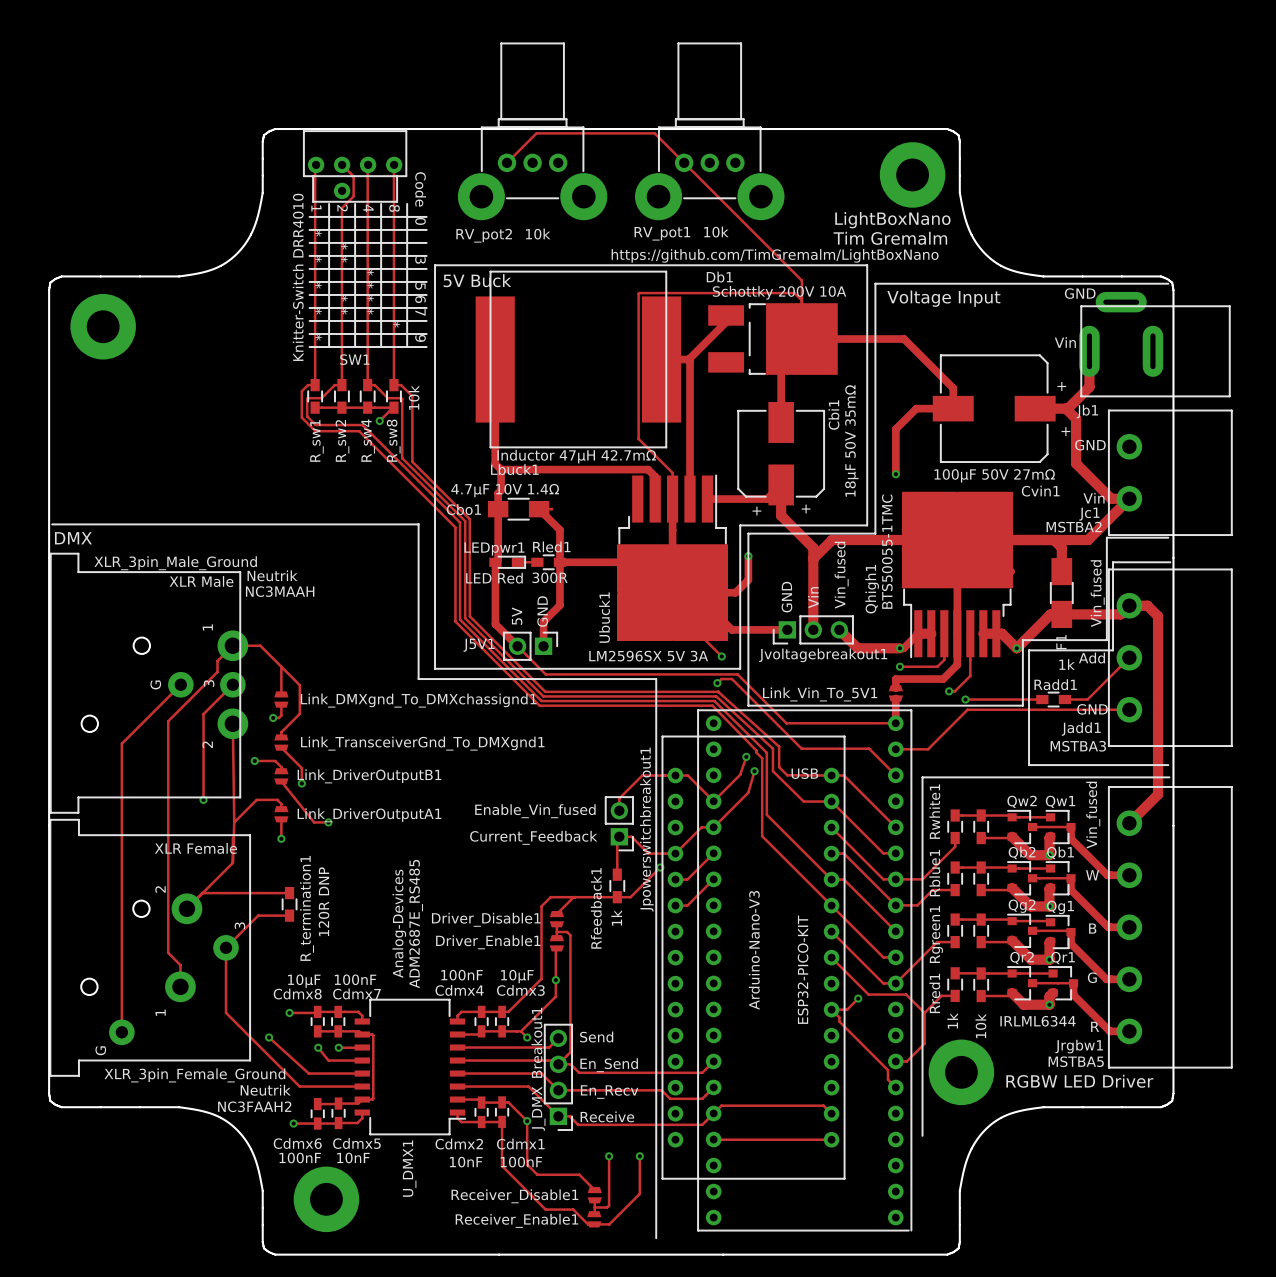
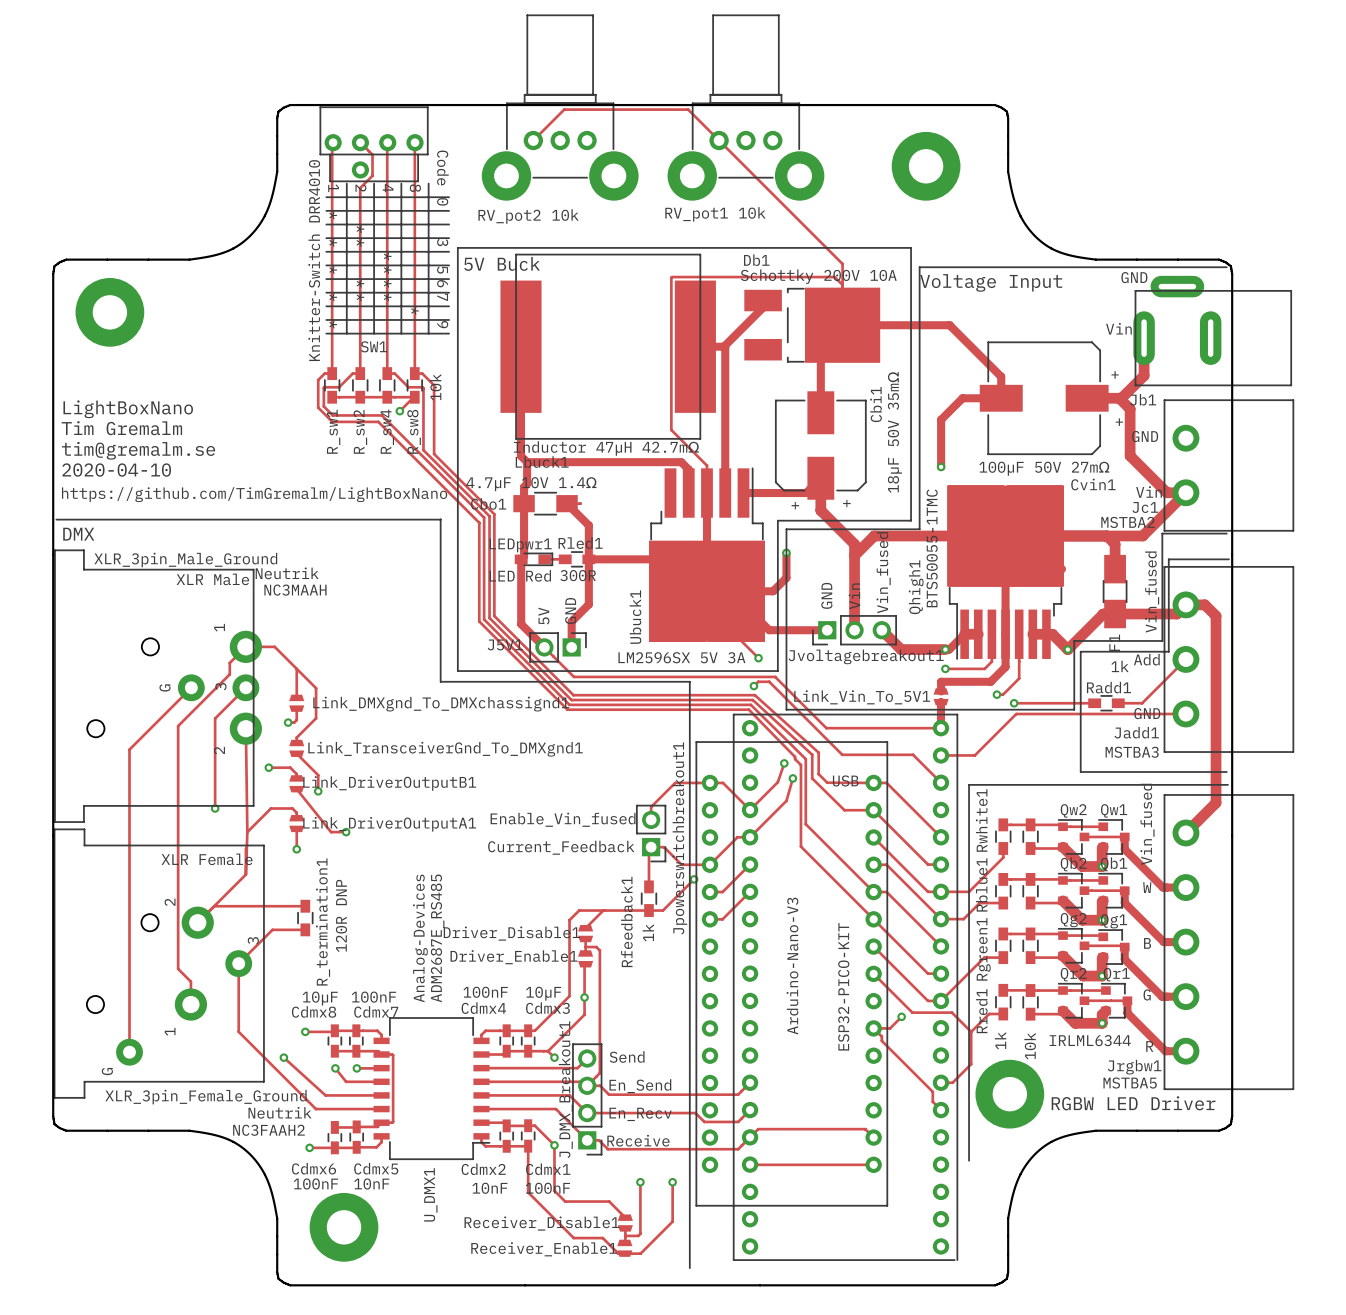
part position: (912, 174) -> (926, 166)
text: LightBoxNano (892, 220) -> none
text: Tim Gremalm (890, 238) -> none
text: https://github.com/TimGremalm/LightBoxNano (775, 255) -> none
text: none -> LightBoxNano (128, 409)
text: none -> Tim Gremalm (121, 428)
text: none -> tim@gremalm.se (138, 450)
text: none -> 2020-04-10 (116, 470)
text: none -> https://github.com/TimGremalm/LightBoxNano (254, 494)

